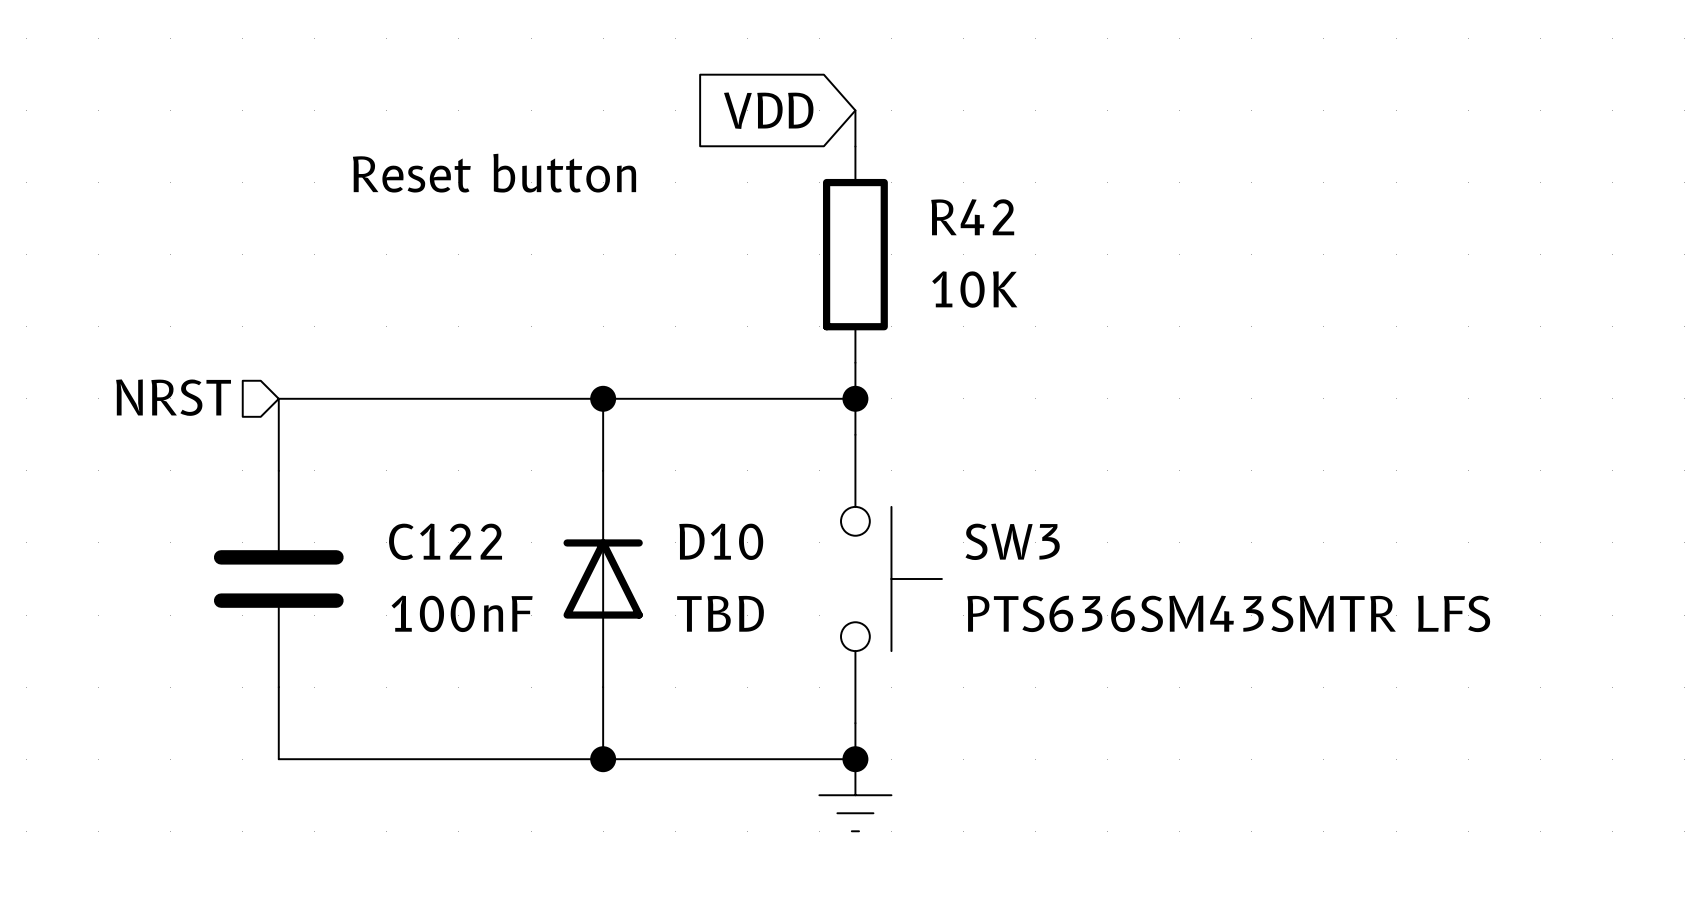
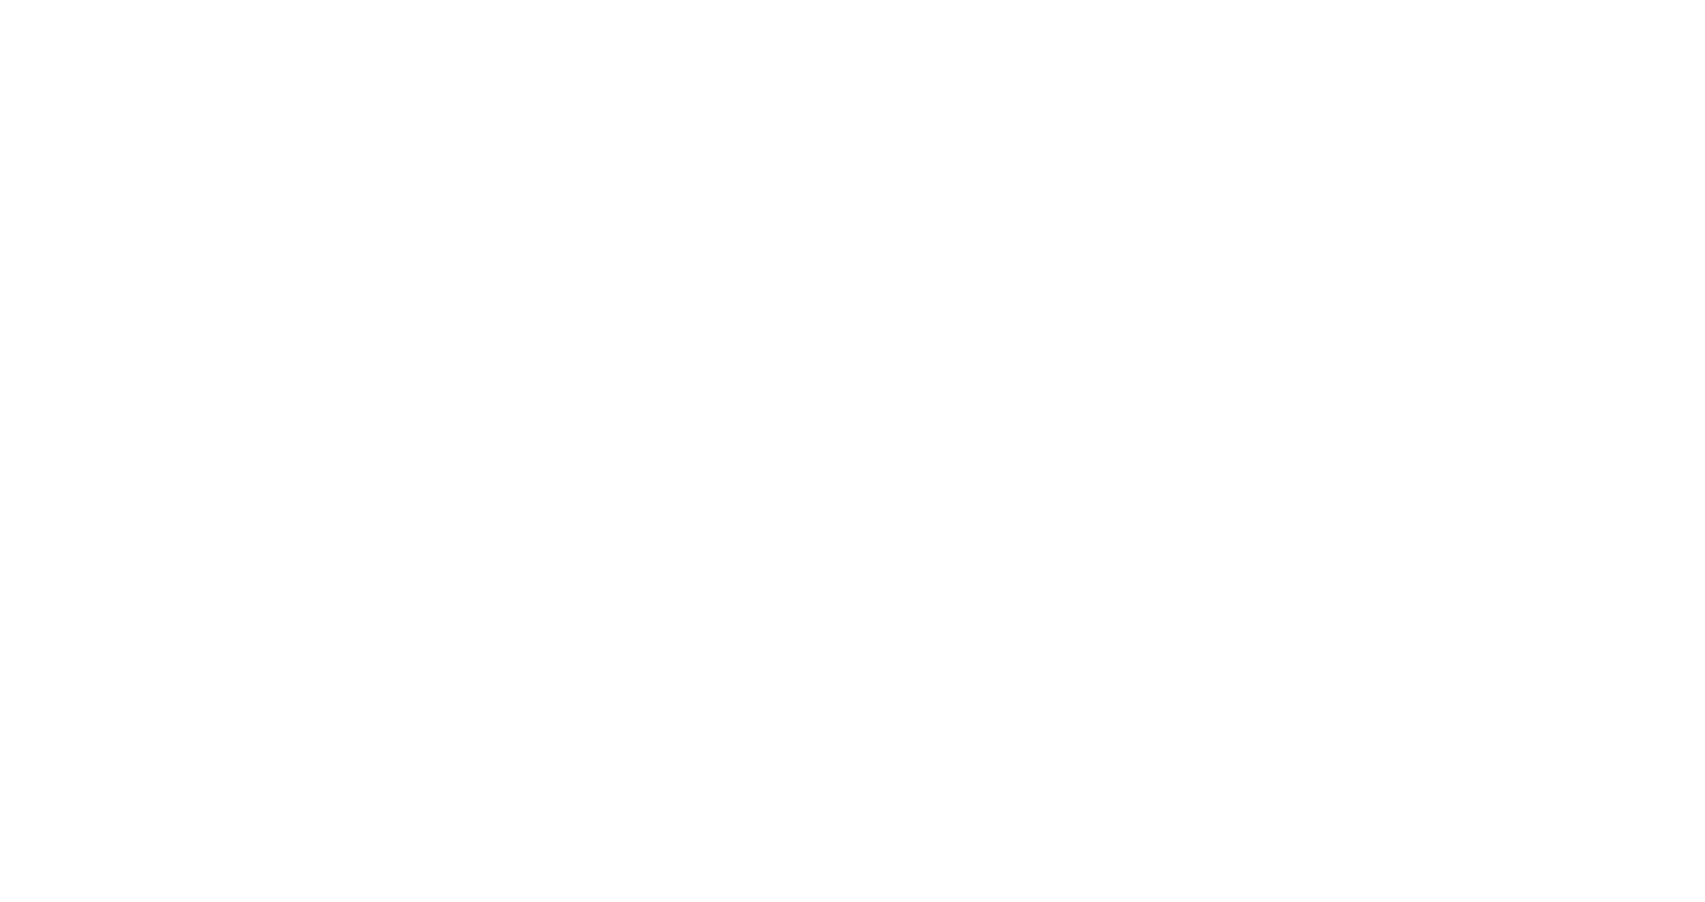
global label: VDD (768, 110) -> none
wire: (855, 110) (855, 146) -> none
text: Reset button (494, 173) -> none
R42: 10K (855, 254) -> none
wire: (855, 362) (855, 434) -> none
hierarchical label: NRST (173, 397) -> none
wire: (603, 398) (603, 470) -> none
junction: (603, 398) -> none
wire: (855, 398) (278, 398) (278, 470) -> none
junction: (855, 398) -> none
C122: 100nF (278, 579) -> none
D10: TBD (603, 579) -> none
SW3: PTS636SM43SMTR LFS (891, 579) -> none
wire: (278, 687) (278, 759) (855, 759) (855, 723) -> none
wire: (603, 687) (603, 759) -> none
junction: (603, 759) -> none
junction: (855, 759) -> none
power symbol: (855, 795) -> none

